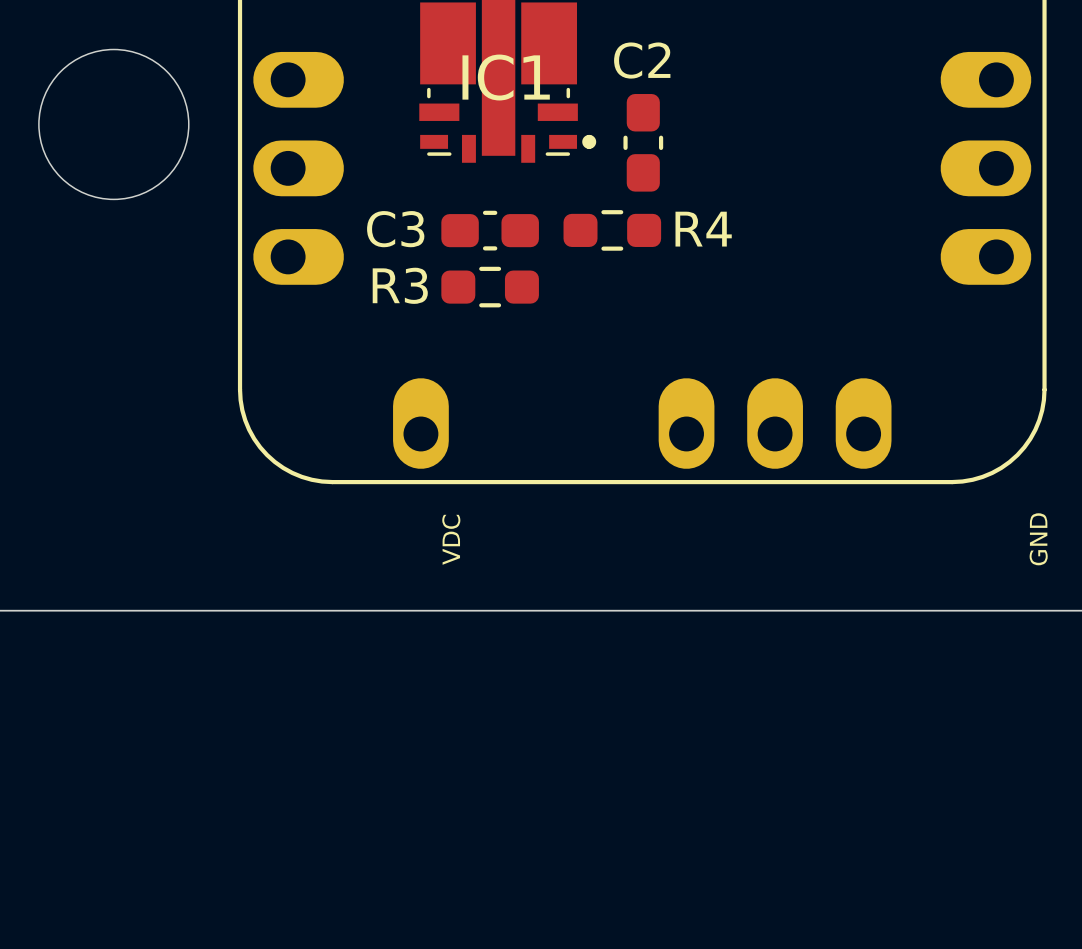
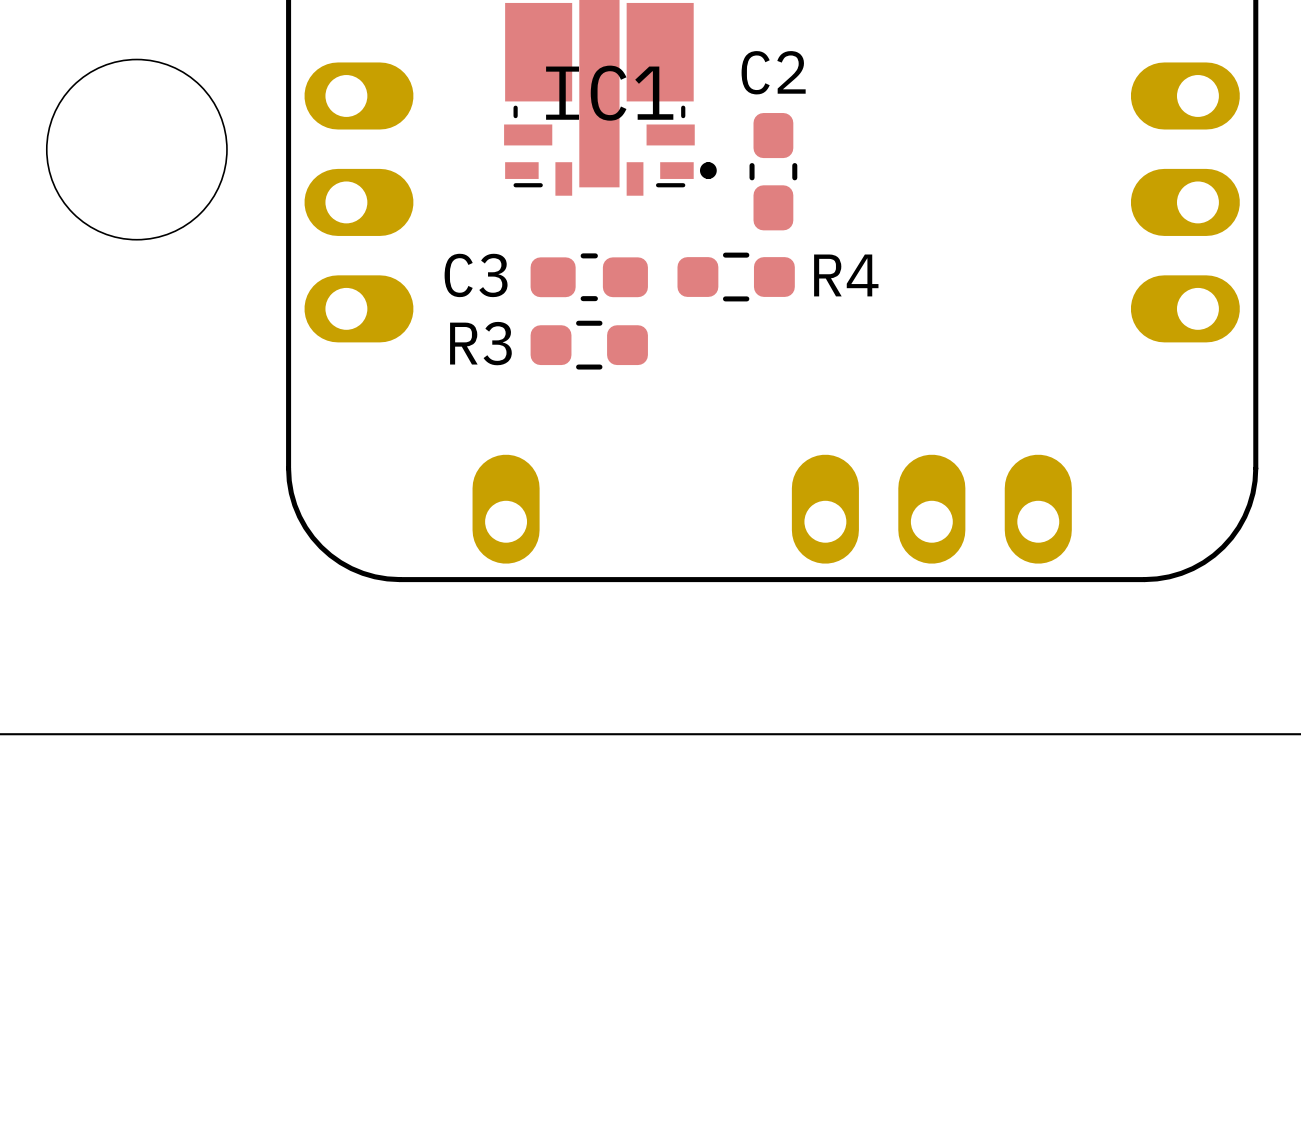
text: VDC (451, 539) -> none
text: GND (1038, 539) -> none

